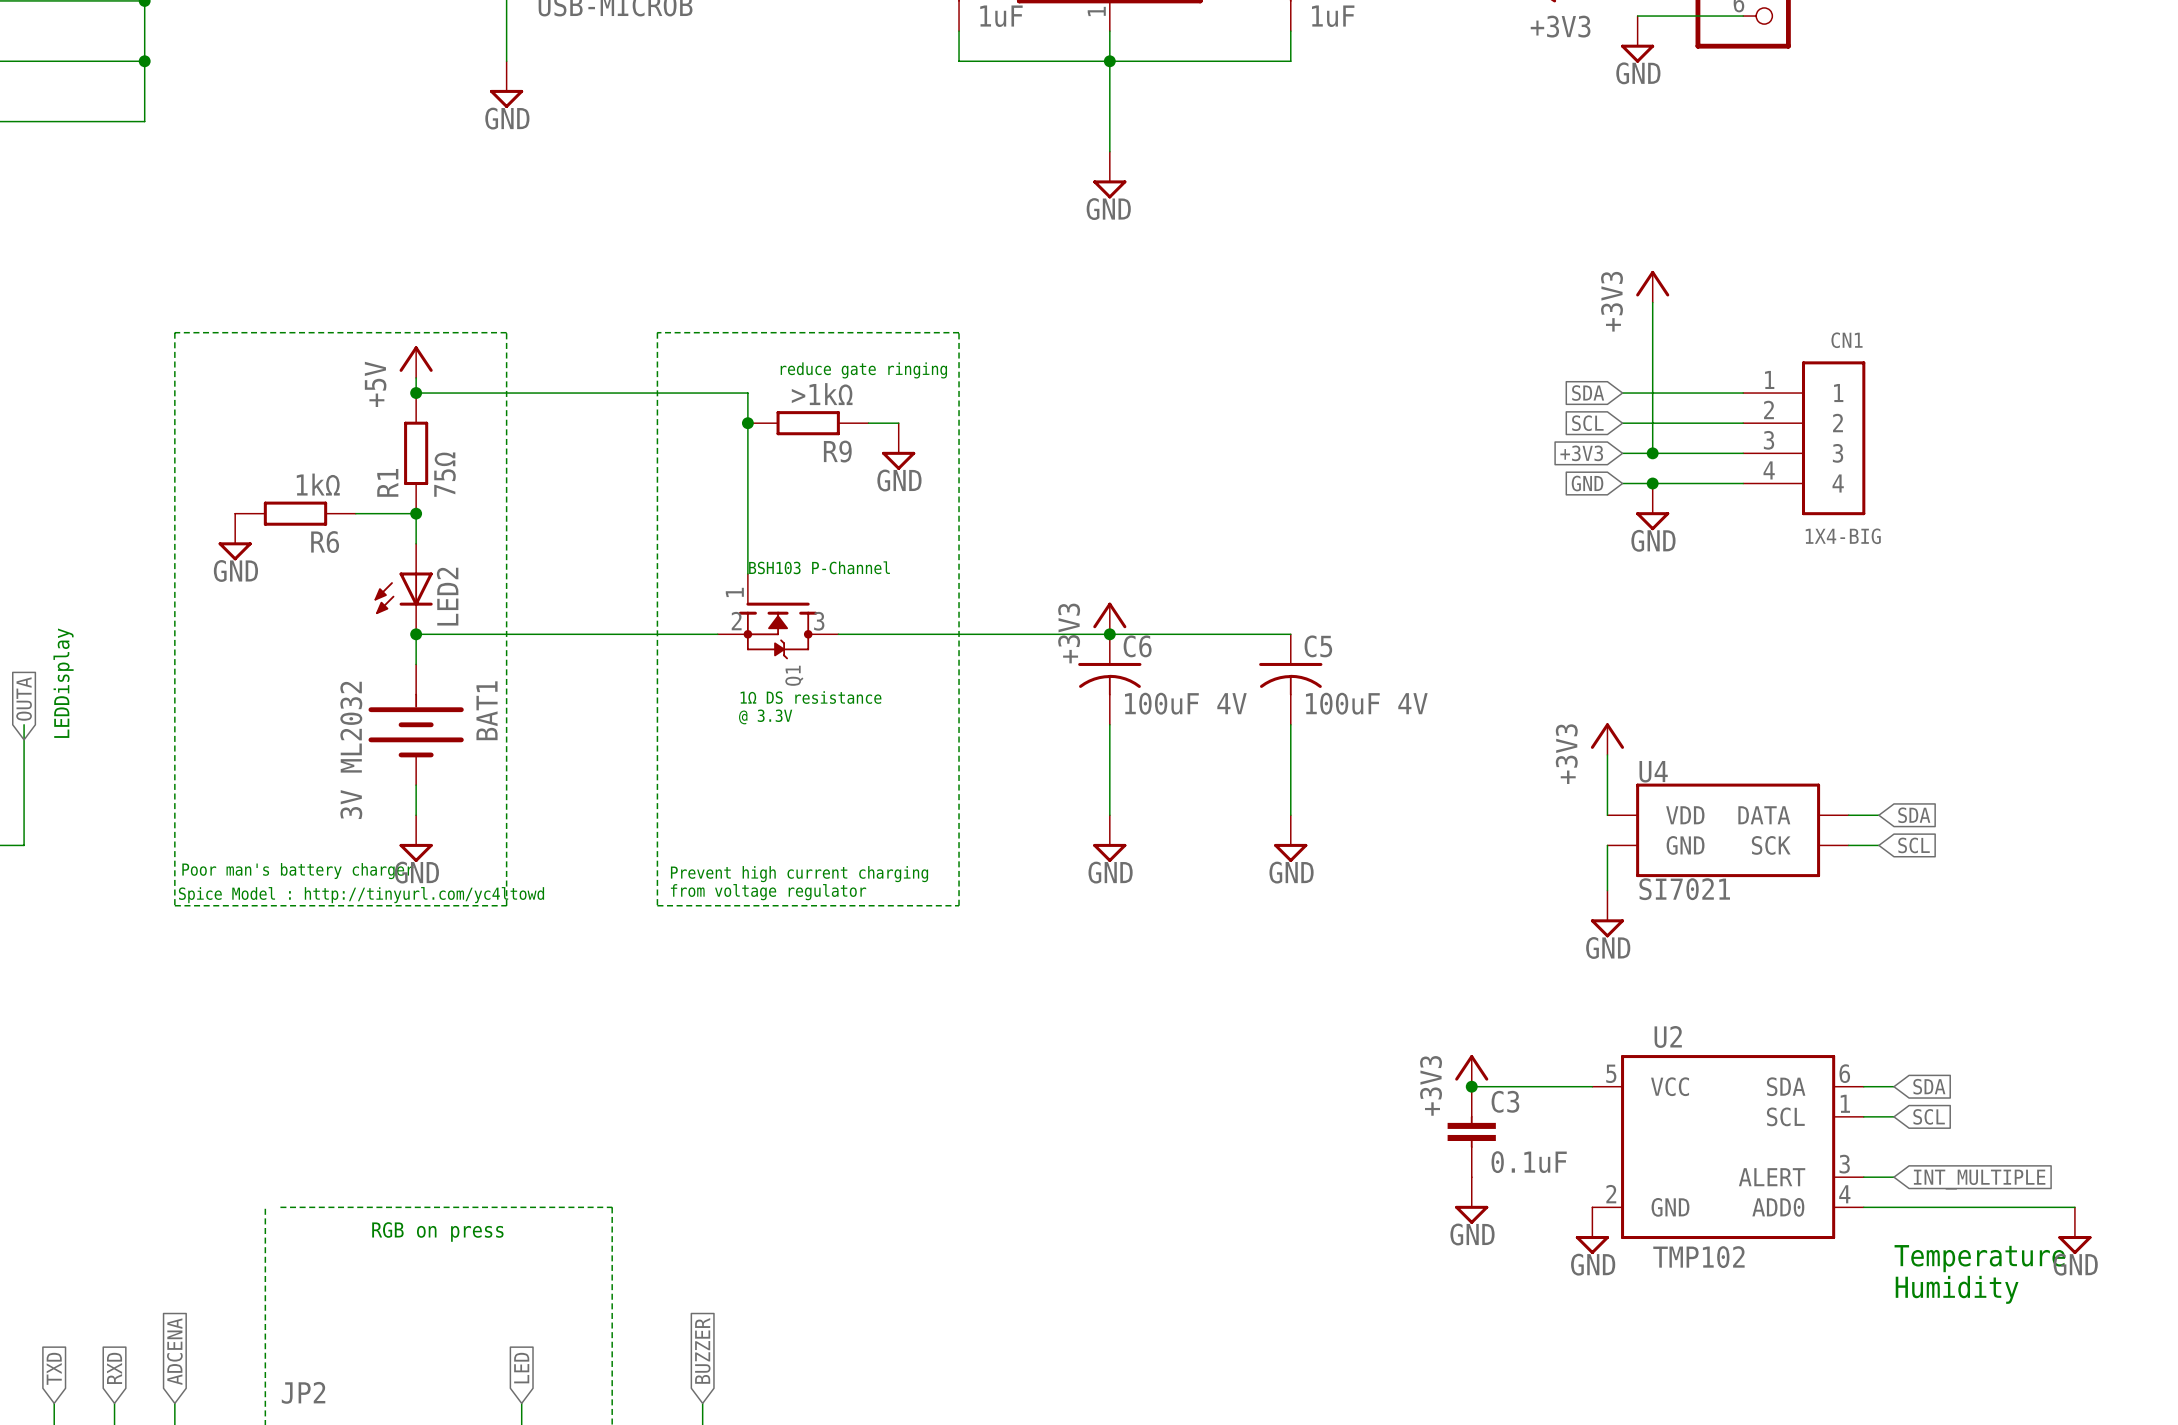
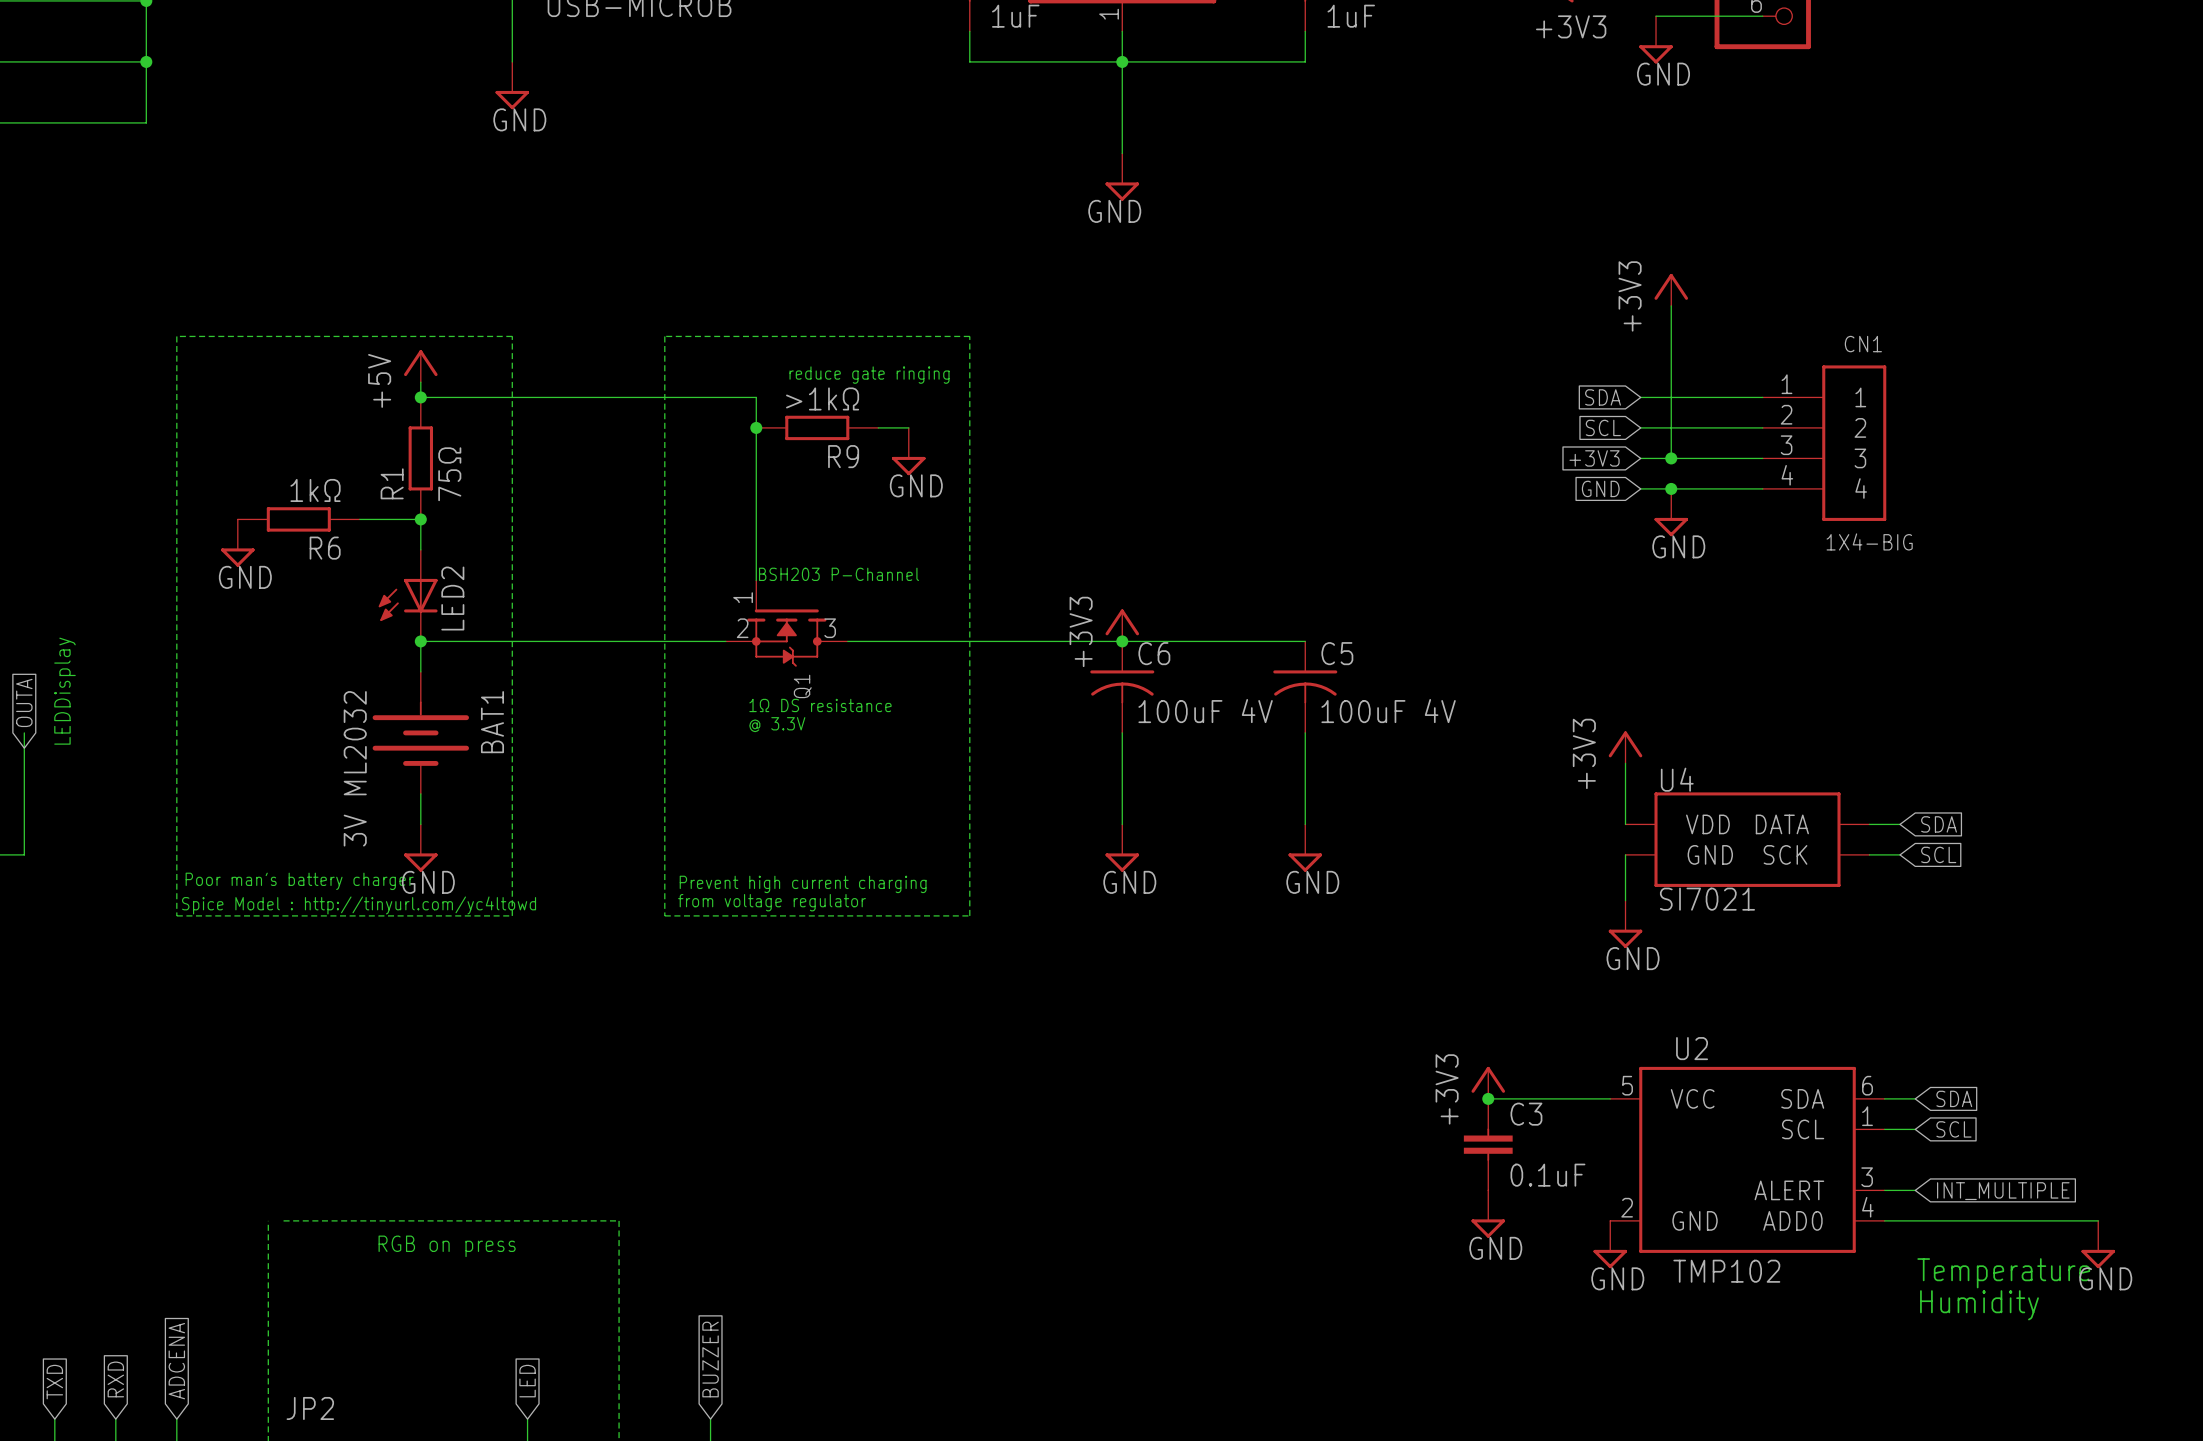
text: BSH103 P-Channel (819, 567) -> BSH203 P-Channel (839, 574)

